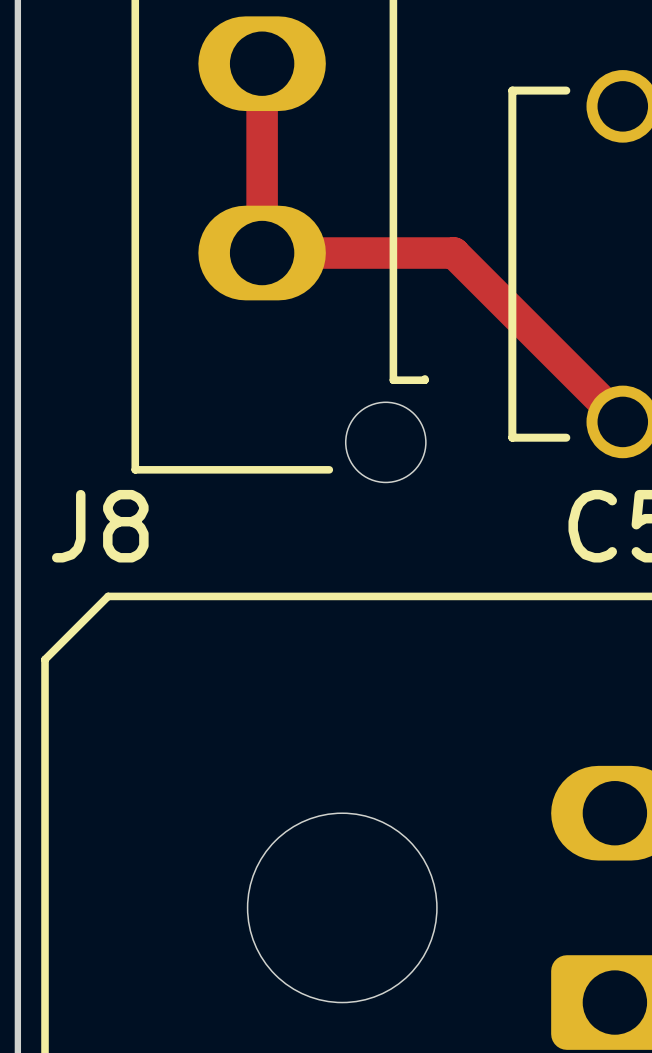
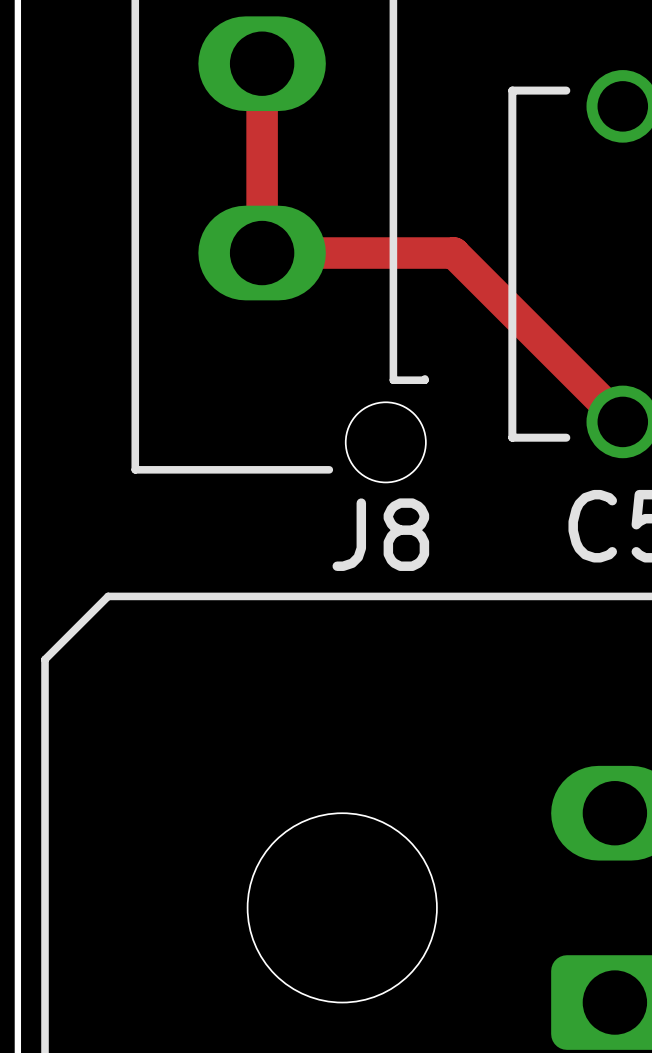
J8 name position: J8 (100, 526) -> J8 (380, 534)

